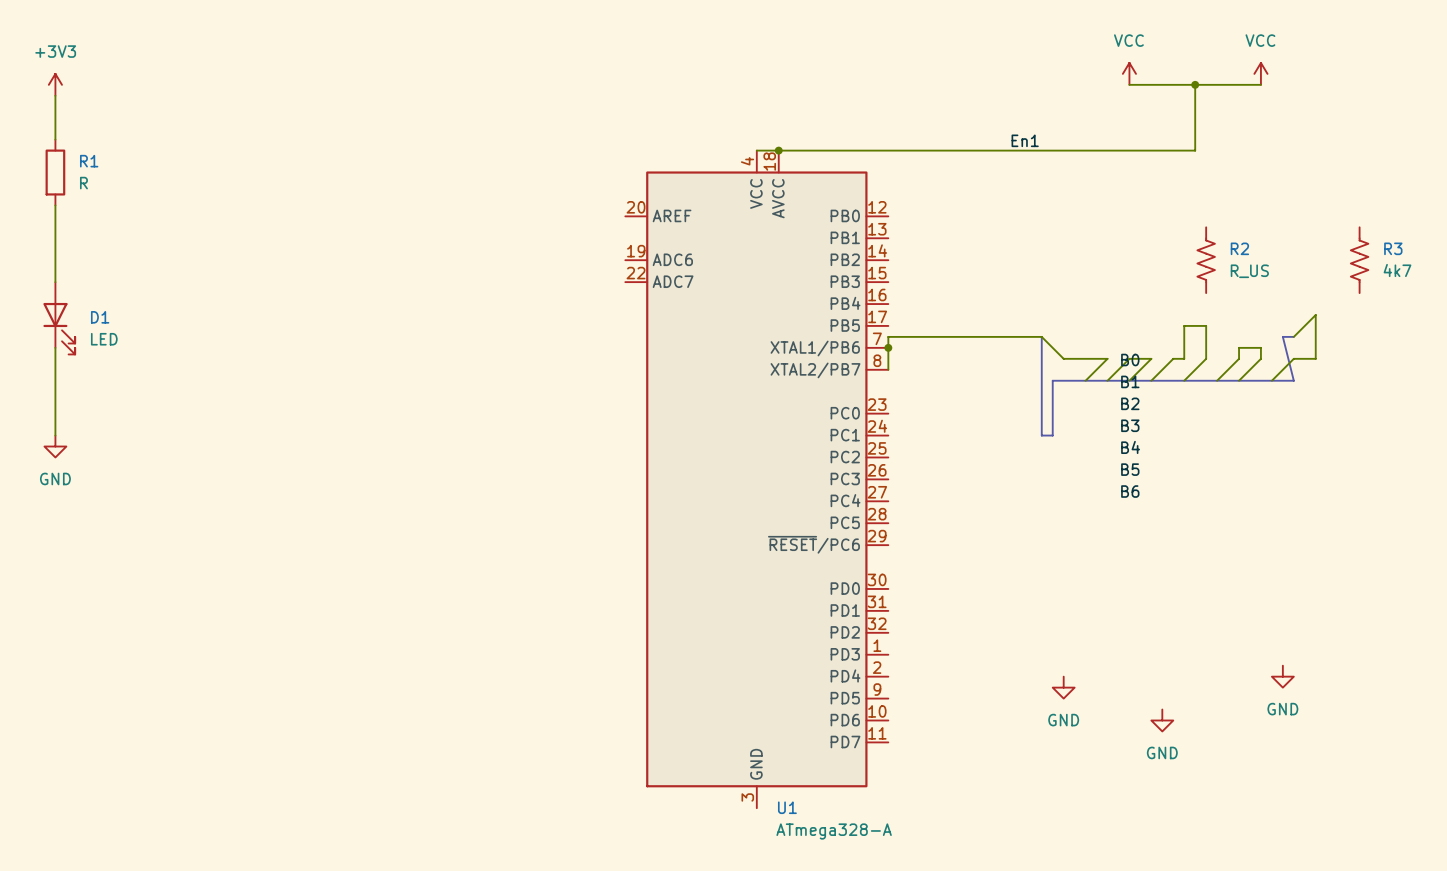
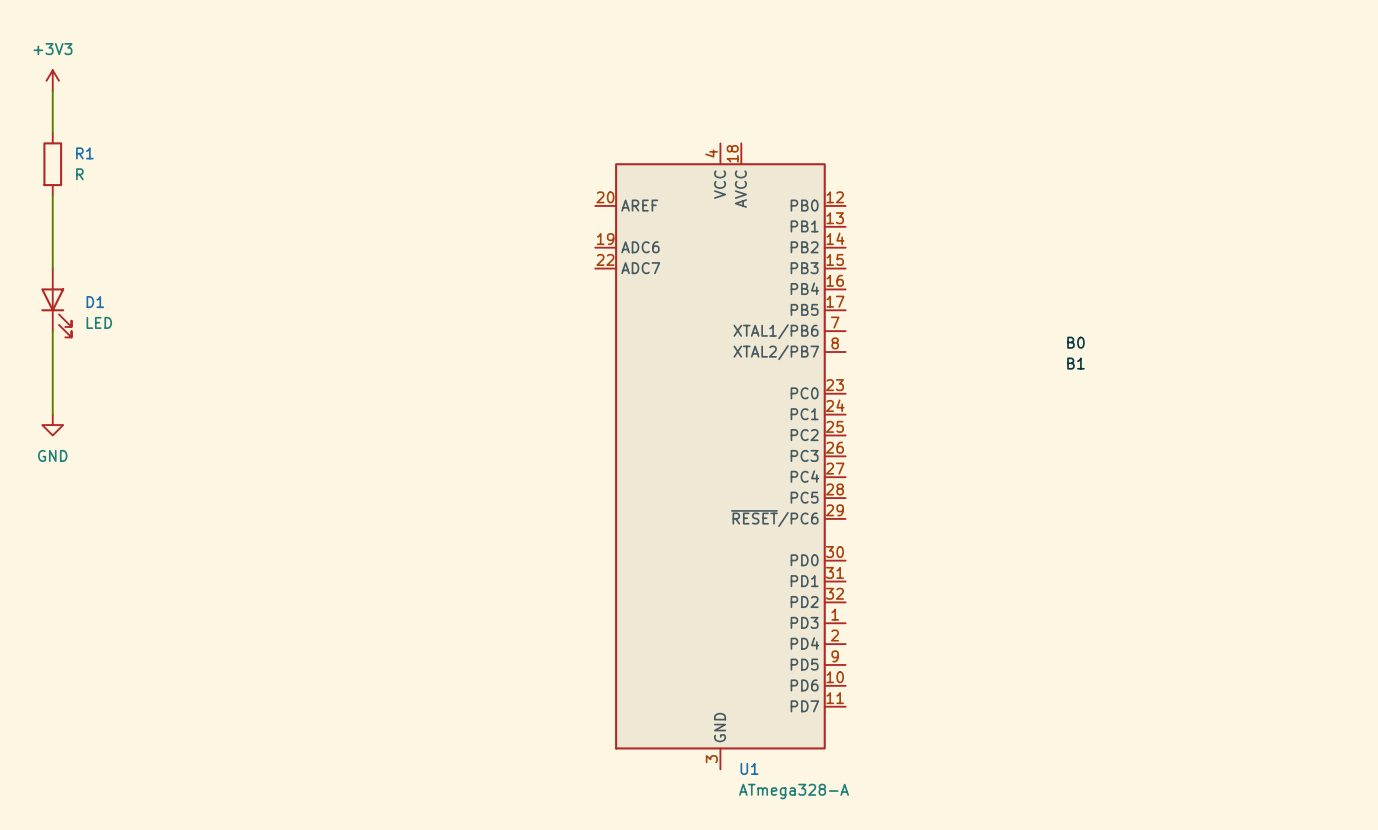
power symbol: VCC (1129, 73) -> none
power symbol: VCC (1260, 73) -> none
wire: (1129, 84) (1260, 84) -> none
wire: (1195, 84) (1195, 150) (756, 150) -> none
junction: (1195, 84) -> none
label: En1 (1025, 140) -> none
junction: (778, 150) -> none
R2: R_US (1206, 260) -> none
R3: 4k7 (1359, 260) -> none
bus: (1041, 336) (1041, 435) (1052, 435) (1052, 380) (1293, 380) (1282, 336) (1293, 336) -> none
wire: (1293, 336) (1315, 314) (1315, 358) (1293, 358) (1271, 380) -> none
junction: (888, 347) -> none
wire: (888, 369) (888, 336) (1041, 336) (1063, 358) (1107, 358) (1085, 380) -> none
wire: (1107, 380) (1129, 358) (1151, 358) (1129, 380) -> none
wire: (1151, 380) (1173, 358) (1184, 358) (1184, 325) (1206, 325) (1206, 358) (1184, 380) -> none
wire: (1217, 380) (1239, 358) (1239, 347) (1260, 347) (1260, 358) (1239, 380) -> none
label: B2 (1130, 403) -> none
label: B3 (1130, 425) -> none
label: B4 (1130, 447) -> none
label: B5 (1130, 469) -> none
label: B6 (1130, 491) -> none
power symbol: GND (1282, 676) -> none
power symbol: GND (1063, 687) -> none
power symbol: GND (1162, 720) -> none

